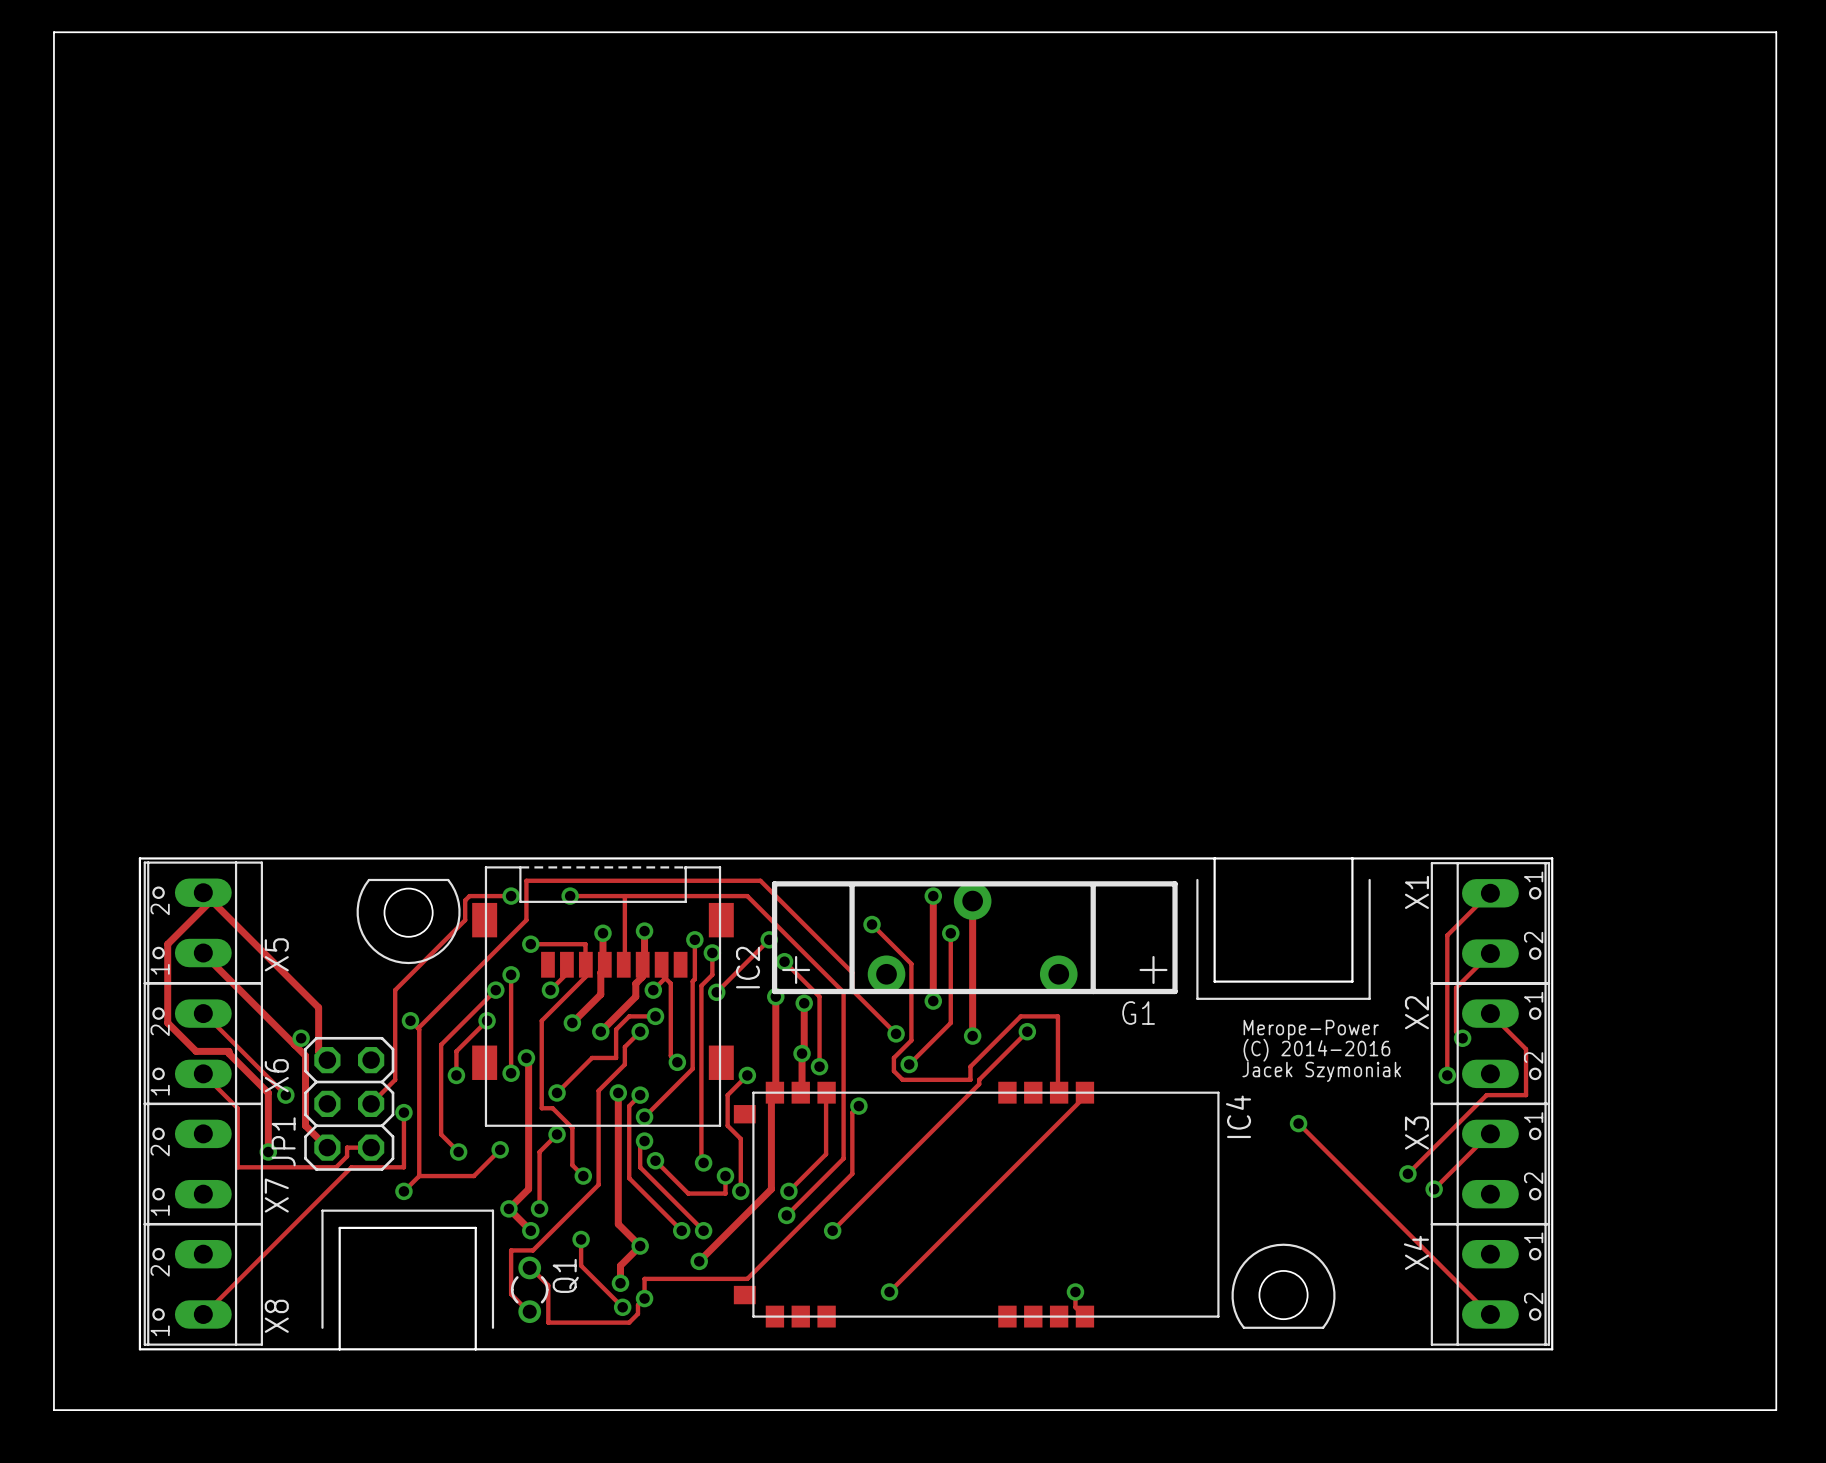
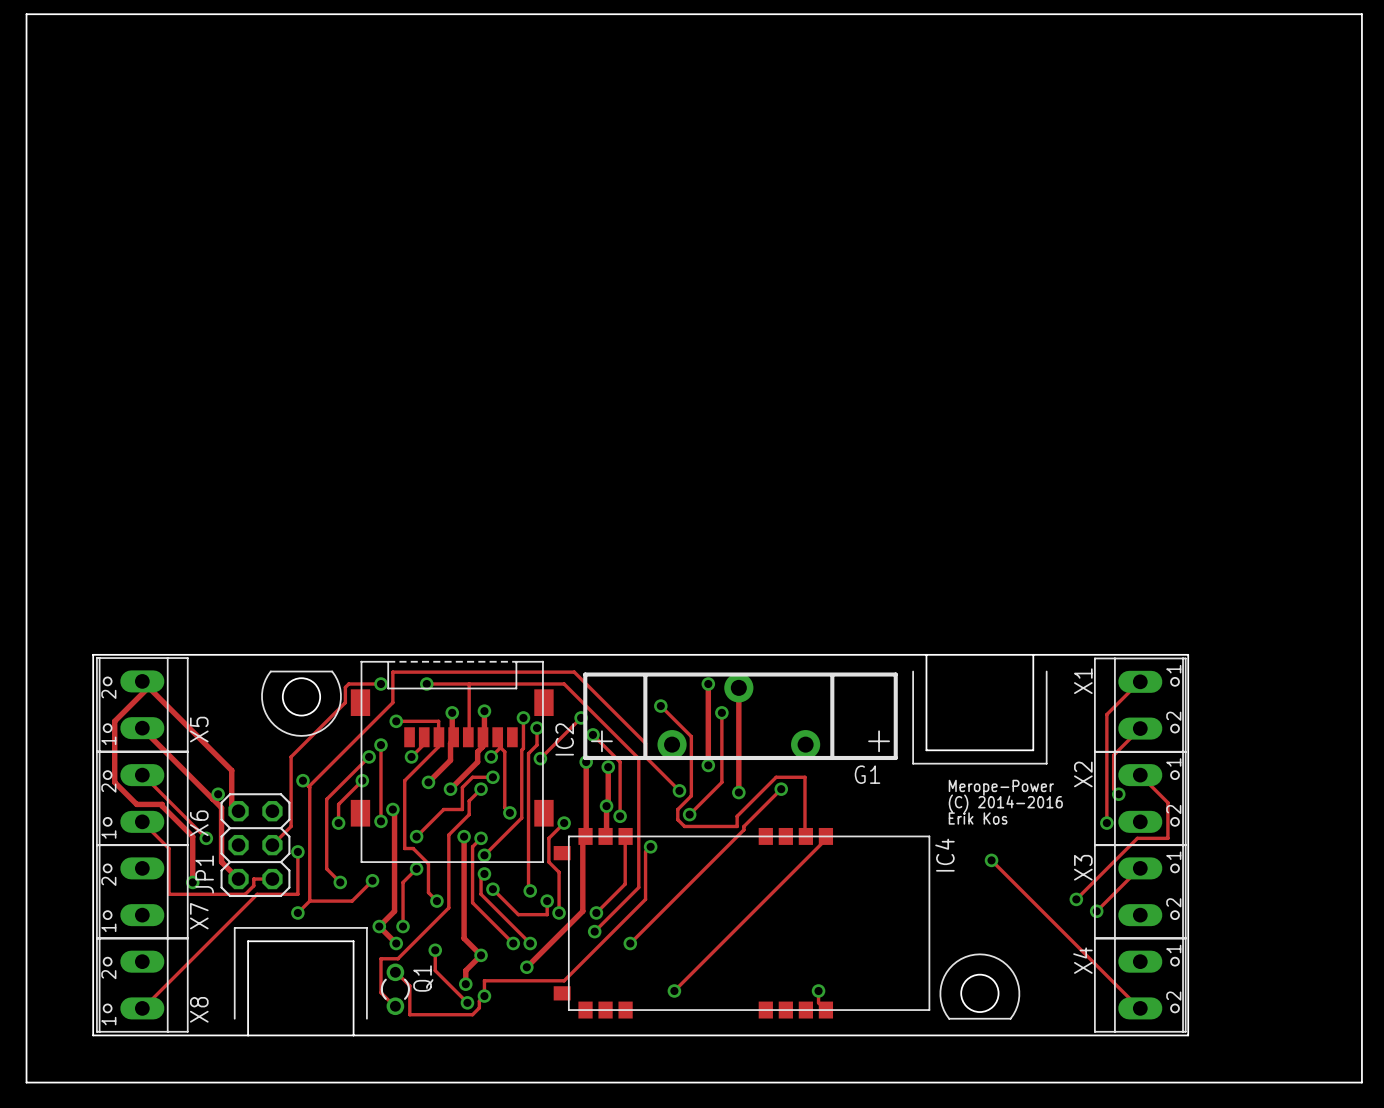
text: Jacek Szymoniak (1321, 1071) -> Erik Kos (978, 818)

